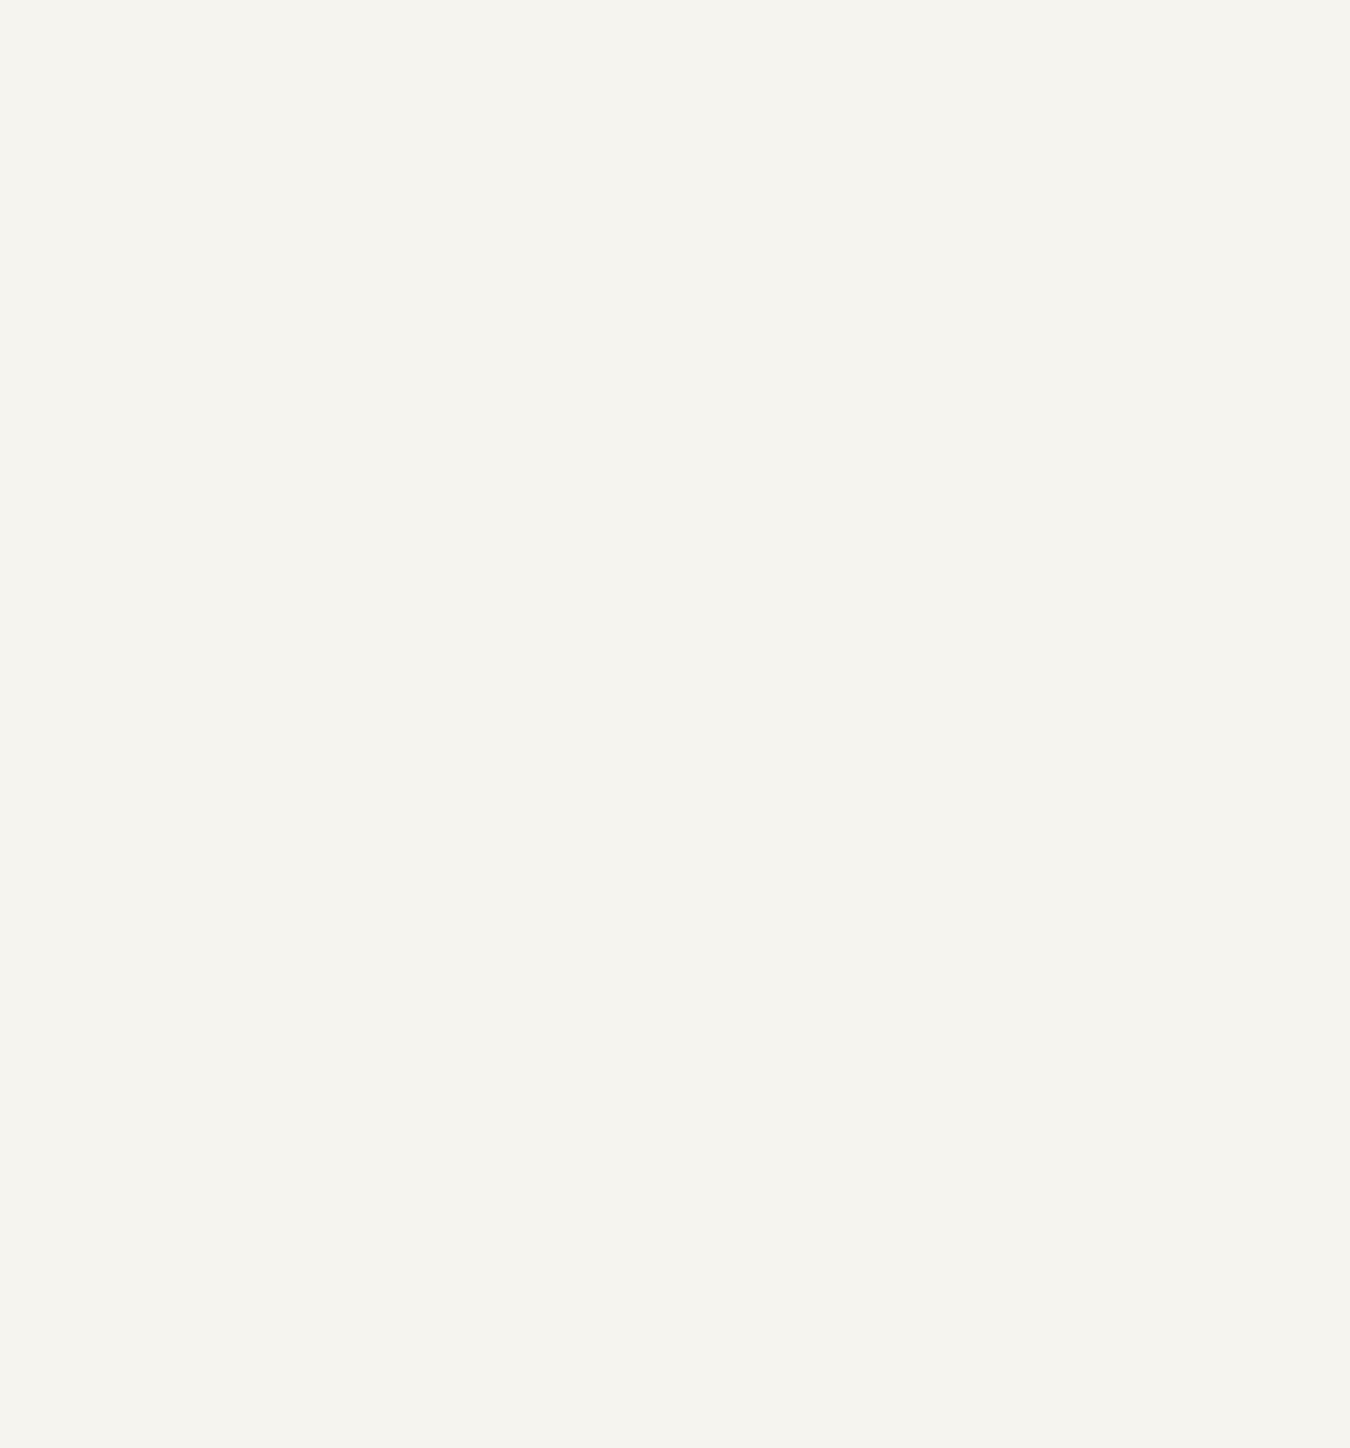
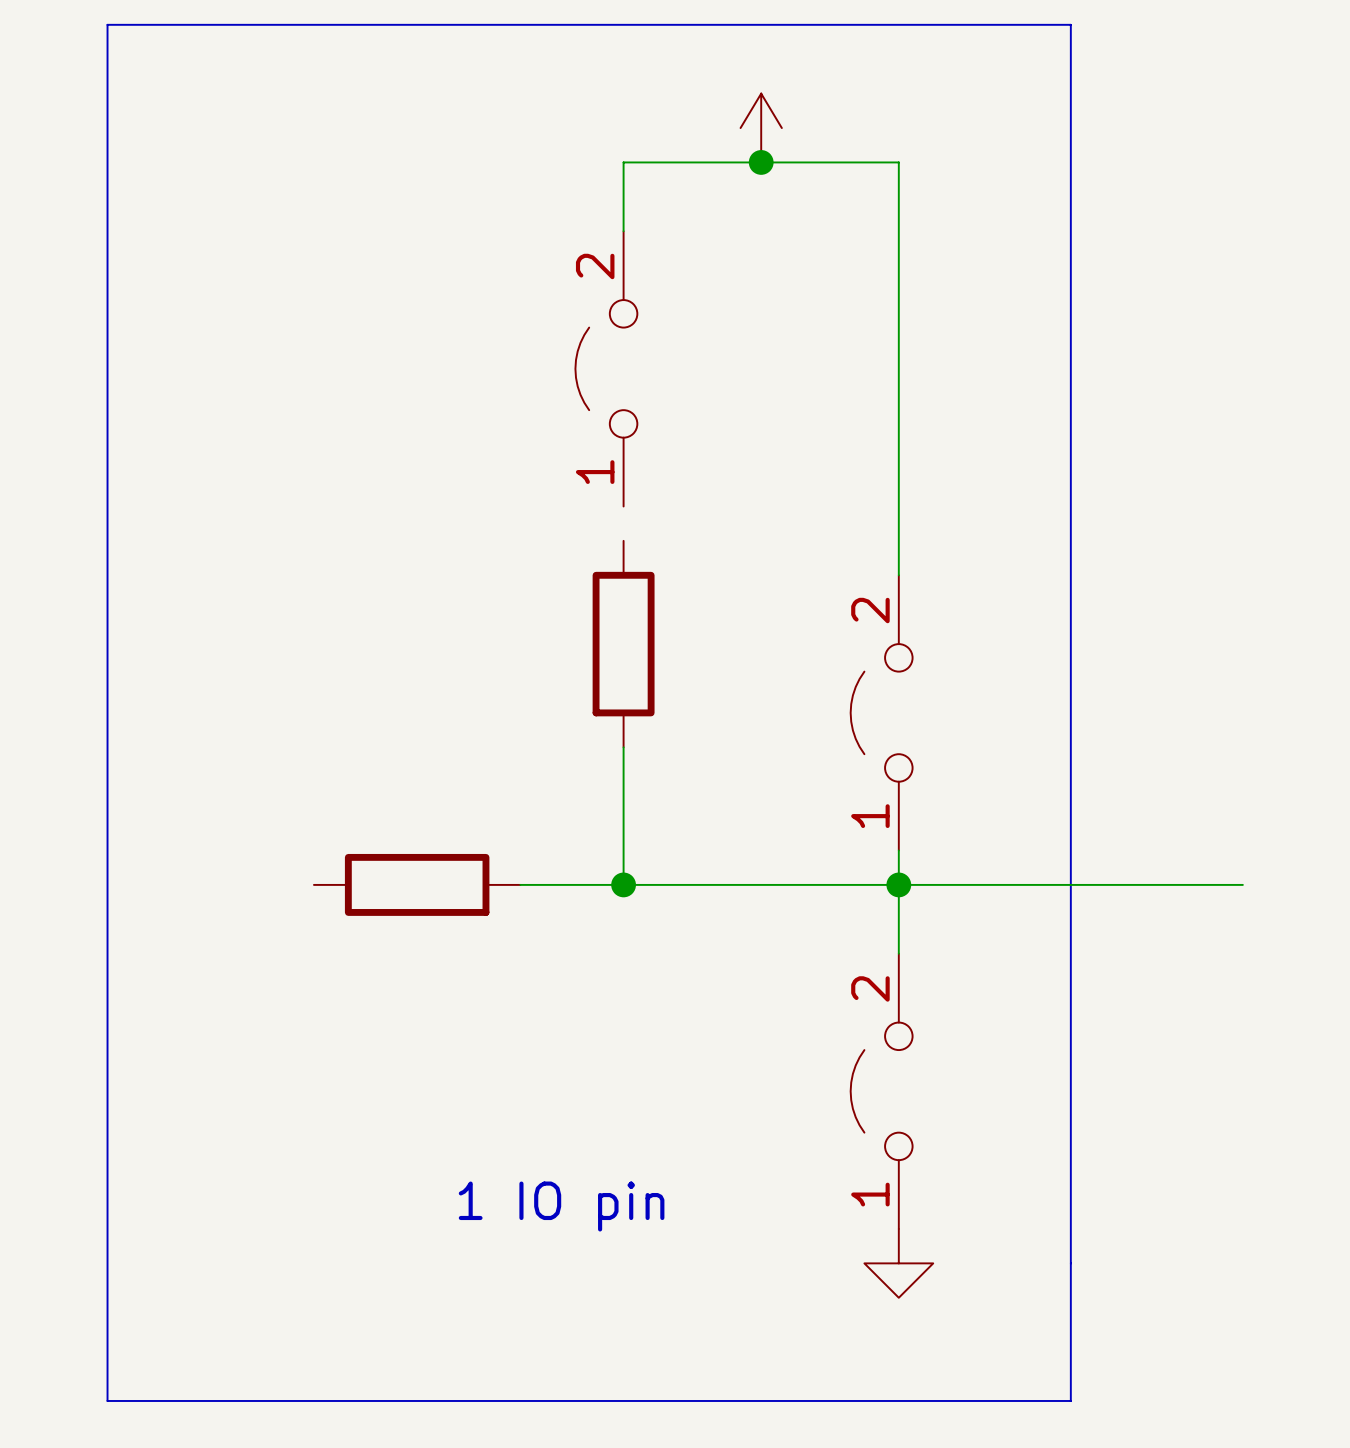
line: none -> (107, 24) (107, 1400) (1070, 1400) (1070, 24) (107, 24)
power symbol: none -> (761, 128)
junction: none -> (761, 162)
wire: none -> (623, 231) (623, 162) (898, 162) (898, 575)
part: none -> (606, 368)
part: none -> (623, 644)
part: none -> (881, 712)
wire: none -> (623, 747) (623, 884)
wire: none -> (898, 850) (898, 953)
part: none -> (417, 884)
wire: none -> (520, 884) (1242, 884)
junction: none -> (623, 884)
junction: none -> (898, 884)
part: none -> (881, 1091)
text: none -> 1 IO pin (561, 1206)
power symbol: none -> (898, 1263)

